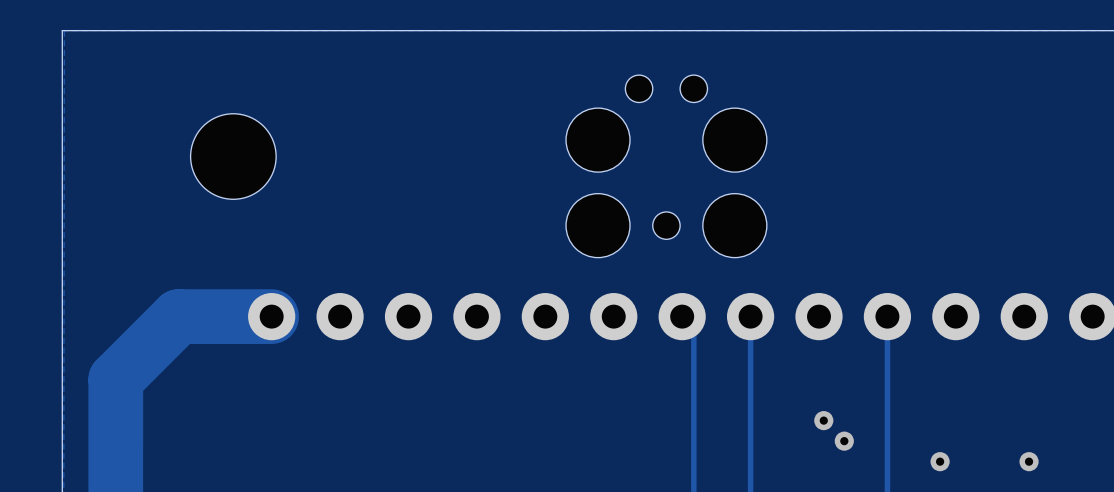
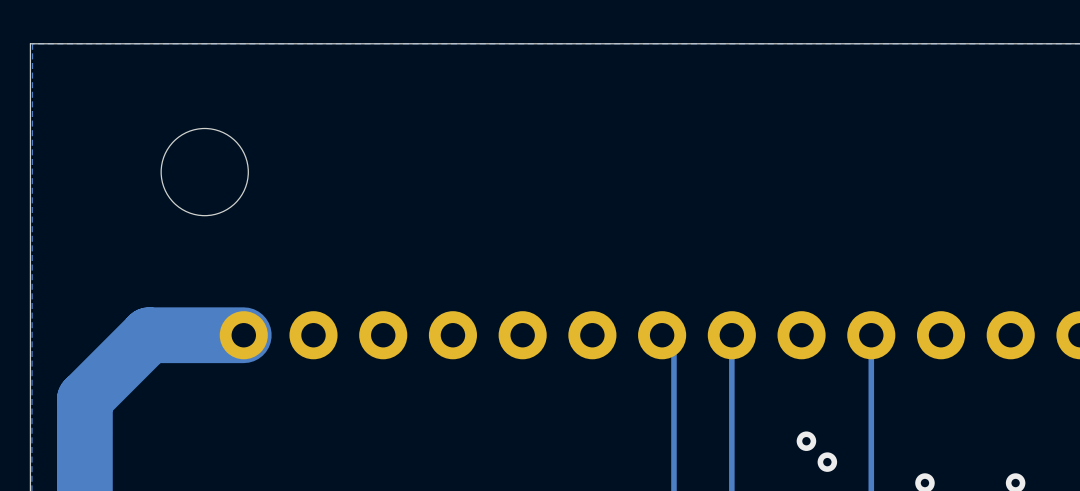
part: (666, 166) -> none

